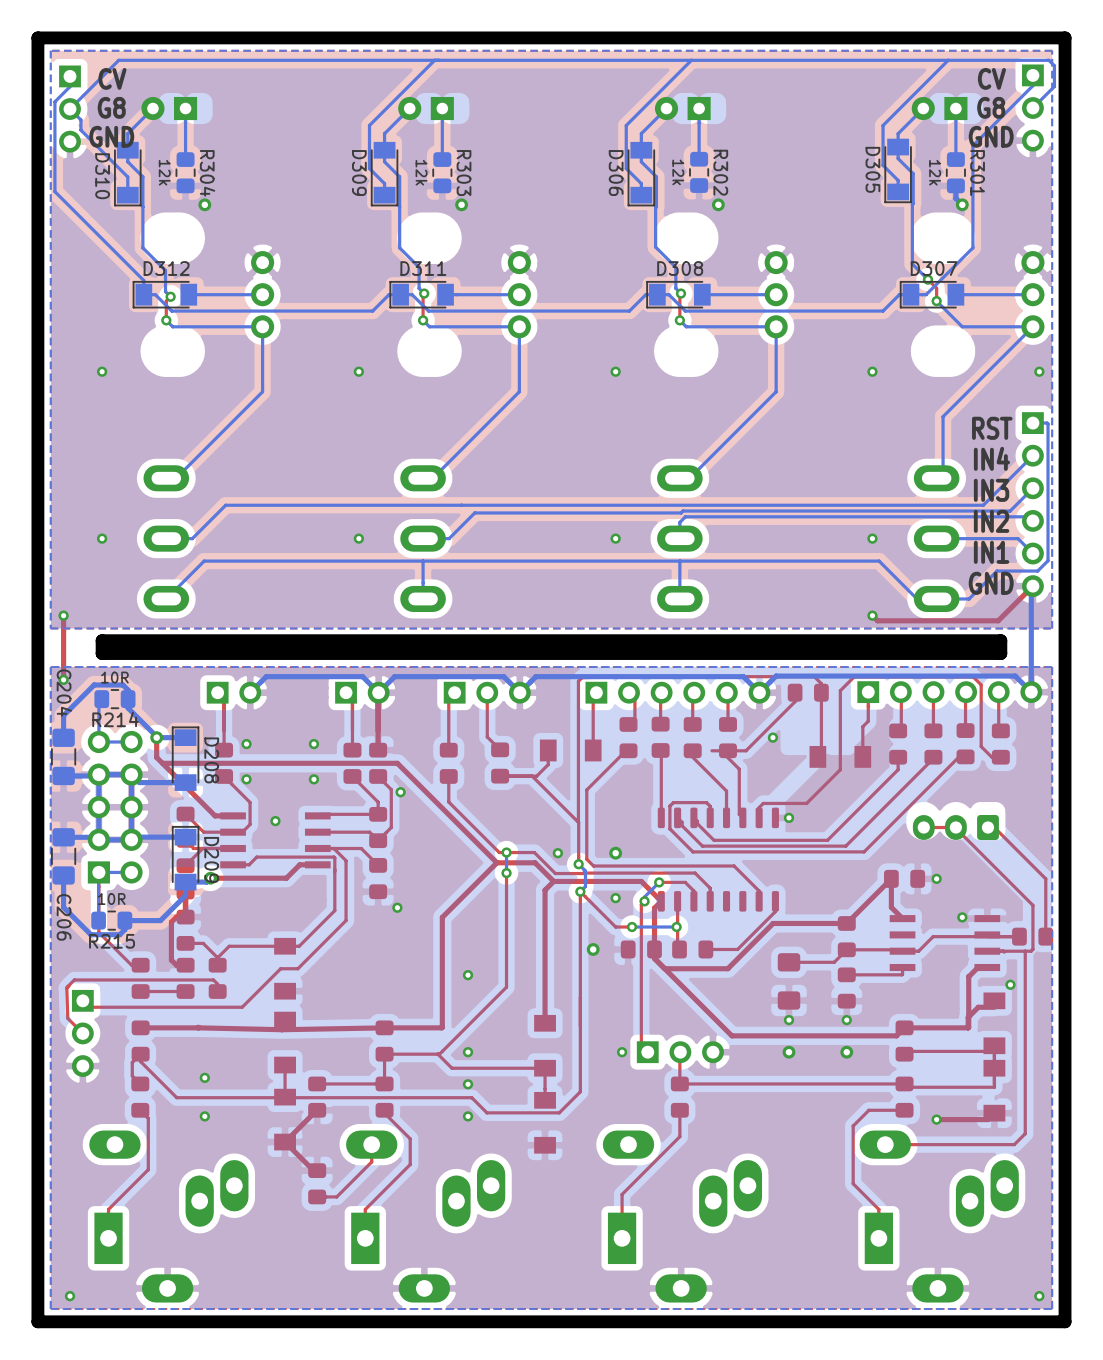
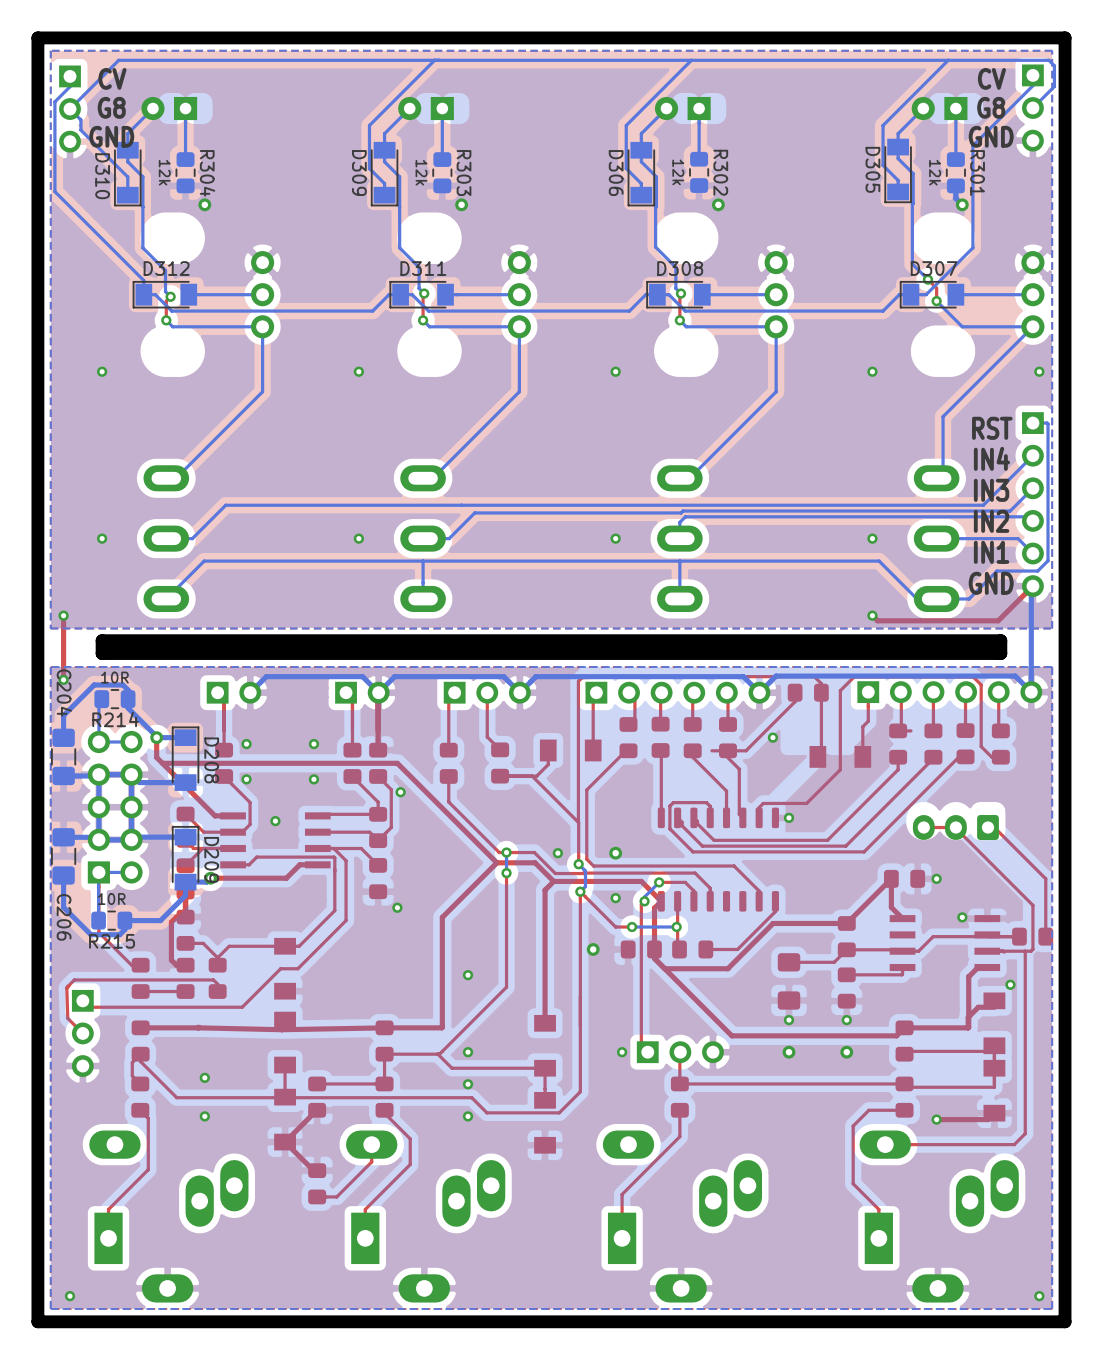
top track: none -> (901, 727) (904, 730) (910, 730)

